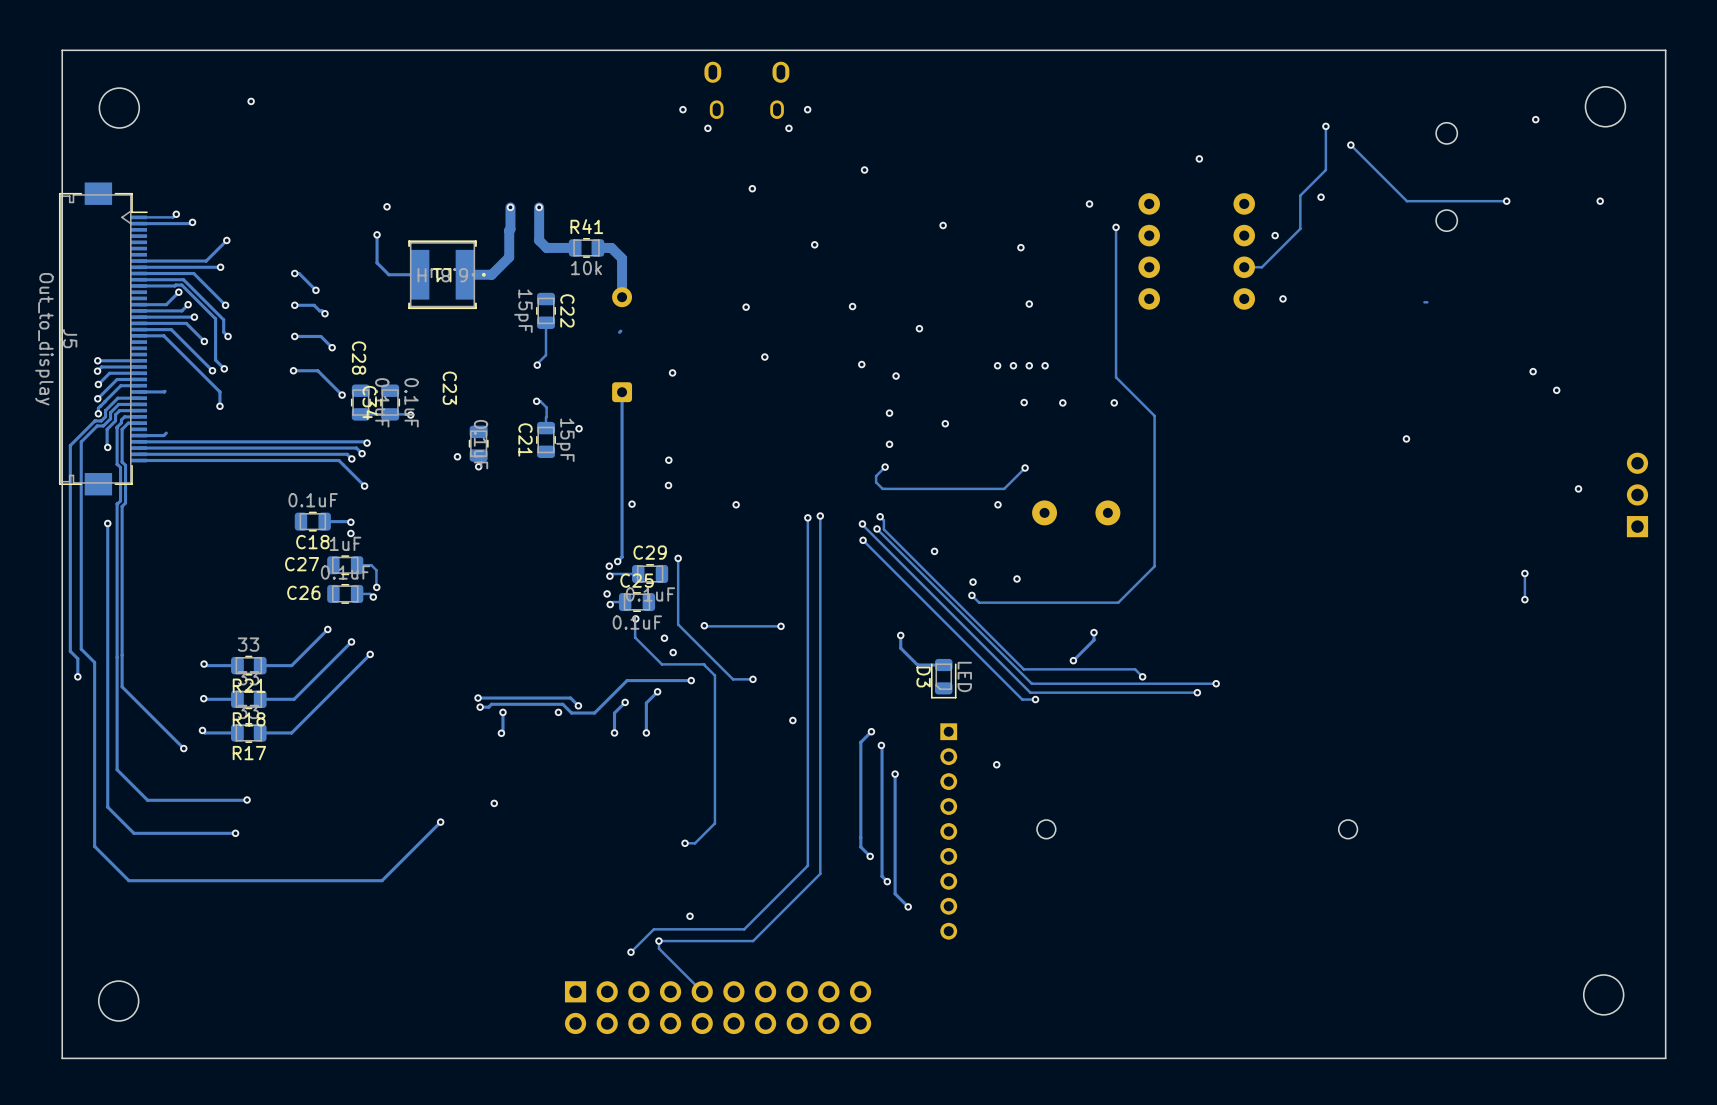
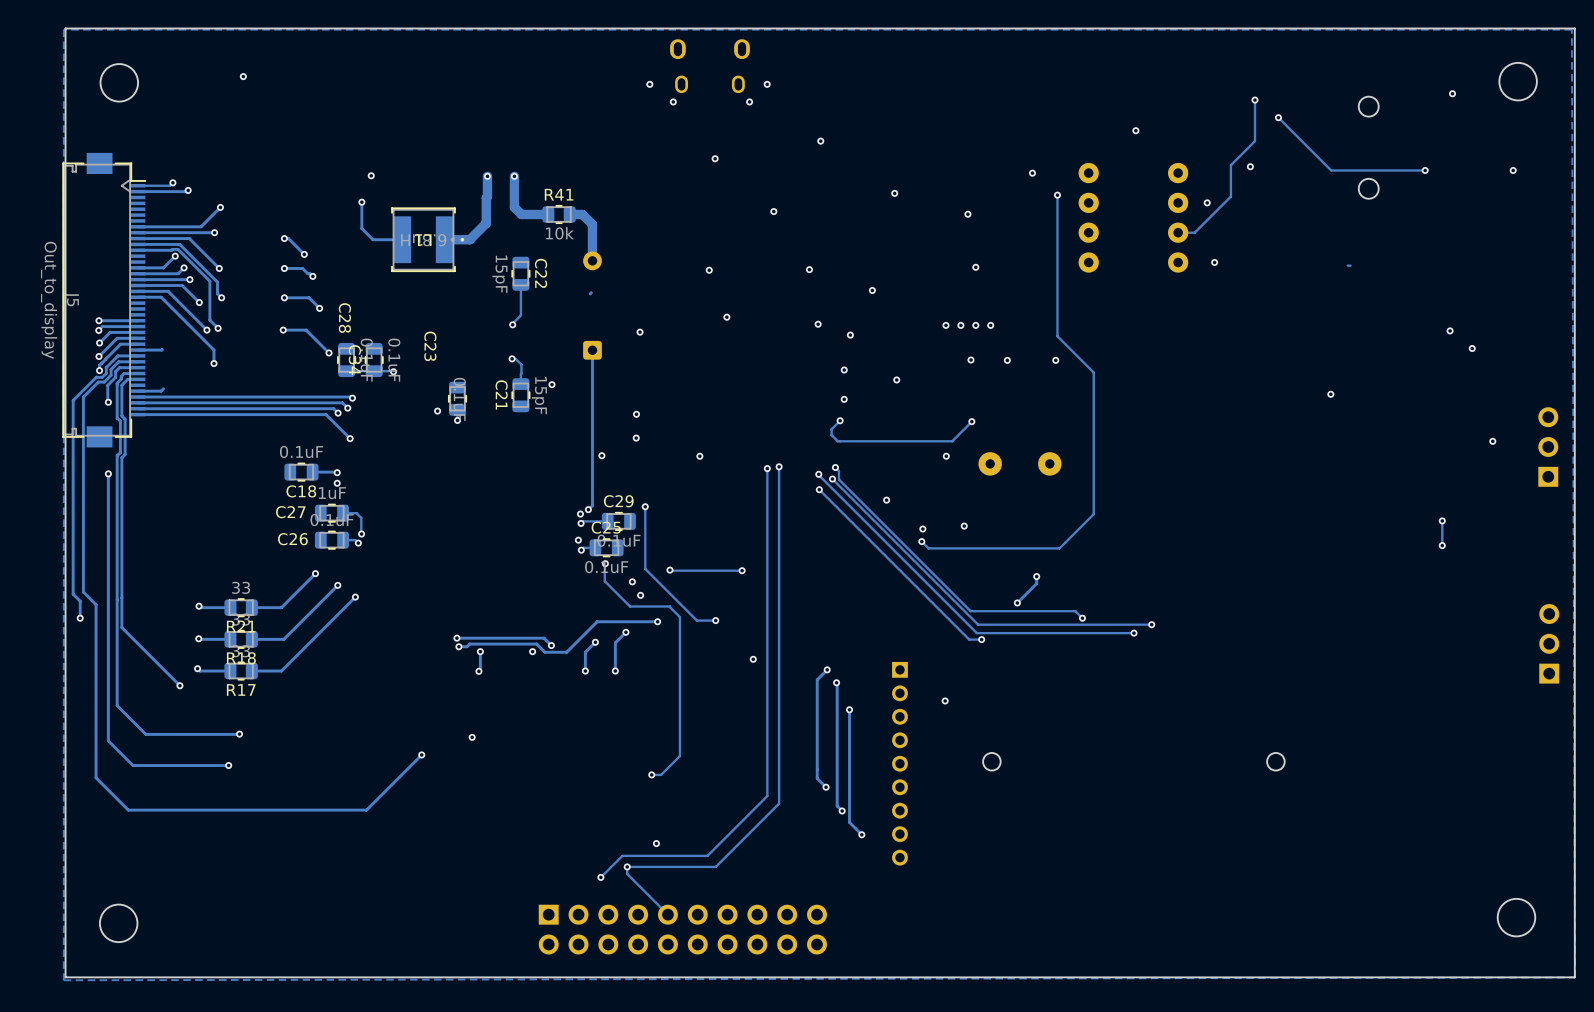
zone outline: none -> (1571, 29) (63, 29) (63, 980) (1575, 977) (1571, 29)
track: (900, 635) (900, 648) (917, 665) (943, 665) -> none
via: (900, 635) -> none
D3: LED (943, 678) -> none
part: none -> (1549, 643)

